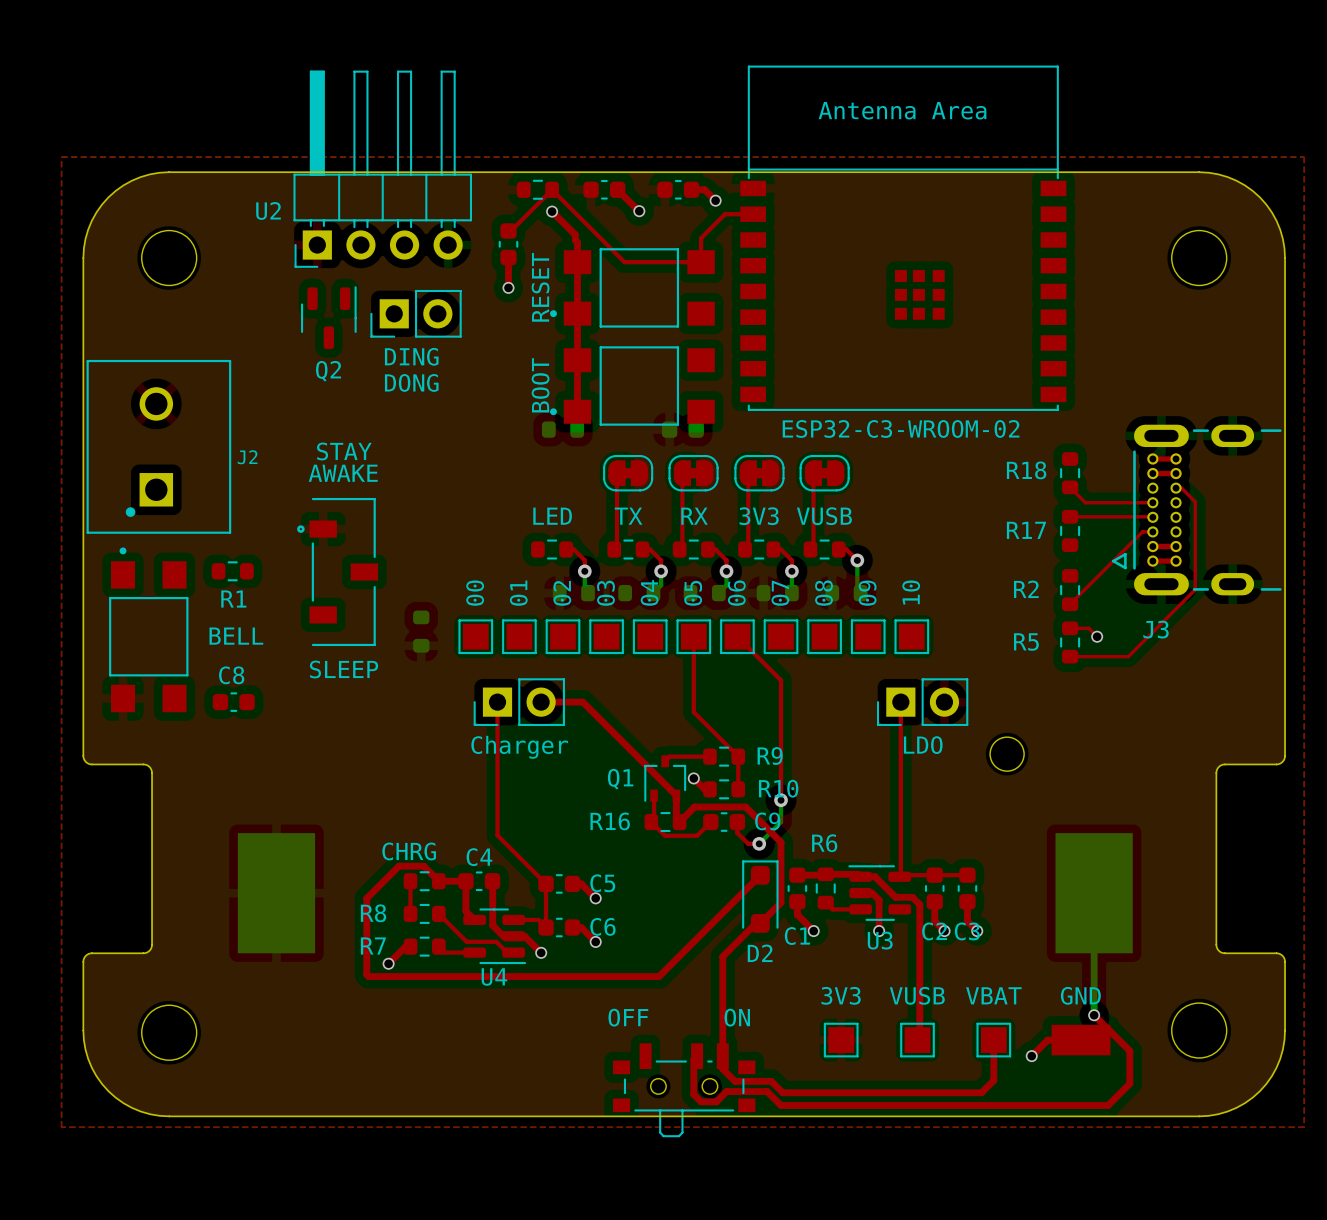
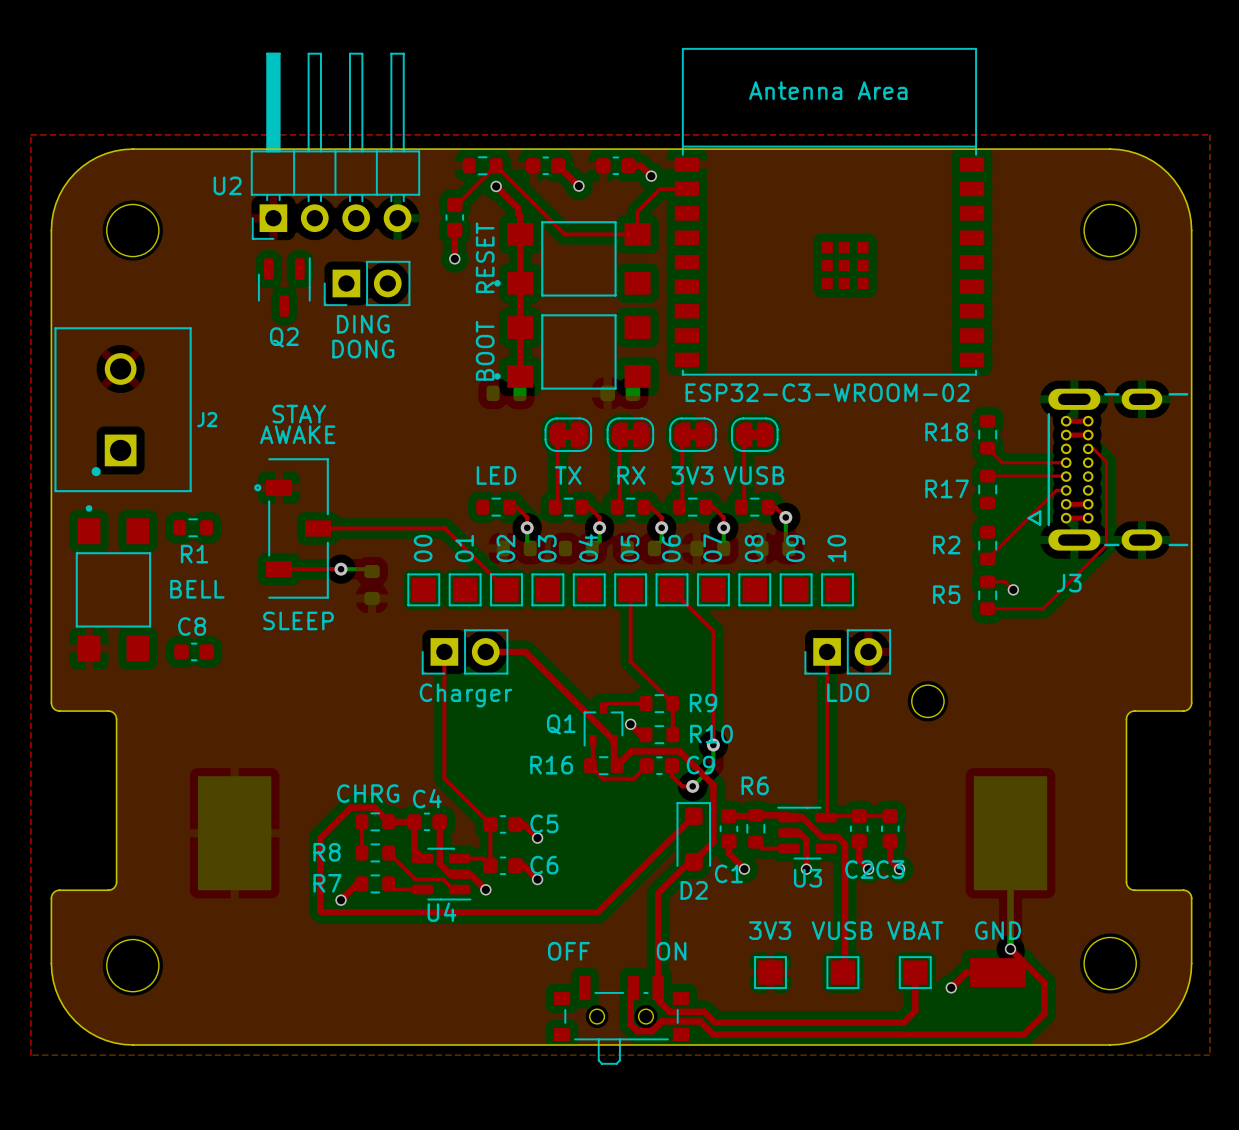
top track: none -> (318, 528) (445, 528) (506, 589)
top track: none -> (278, 569) (341, 569)
bottom track: none -> (341, 569) (369, 569) (372, 571)
via: none -> (341, 569)

